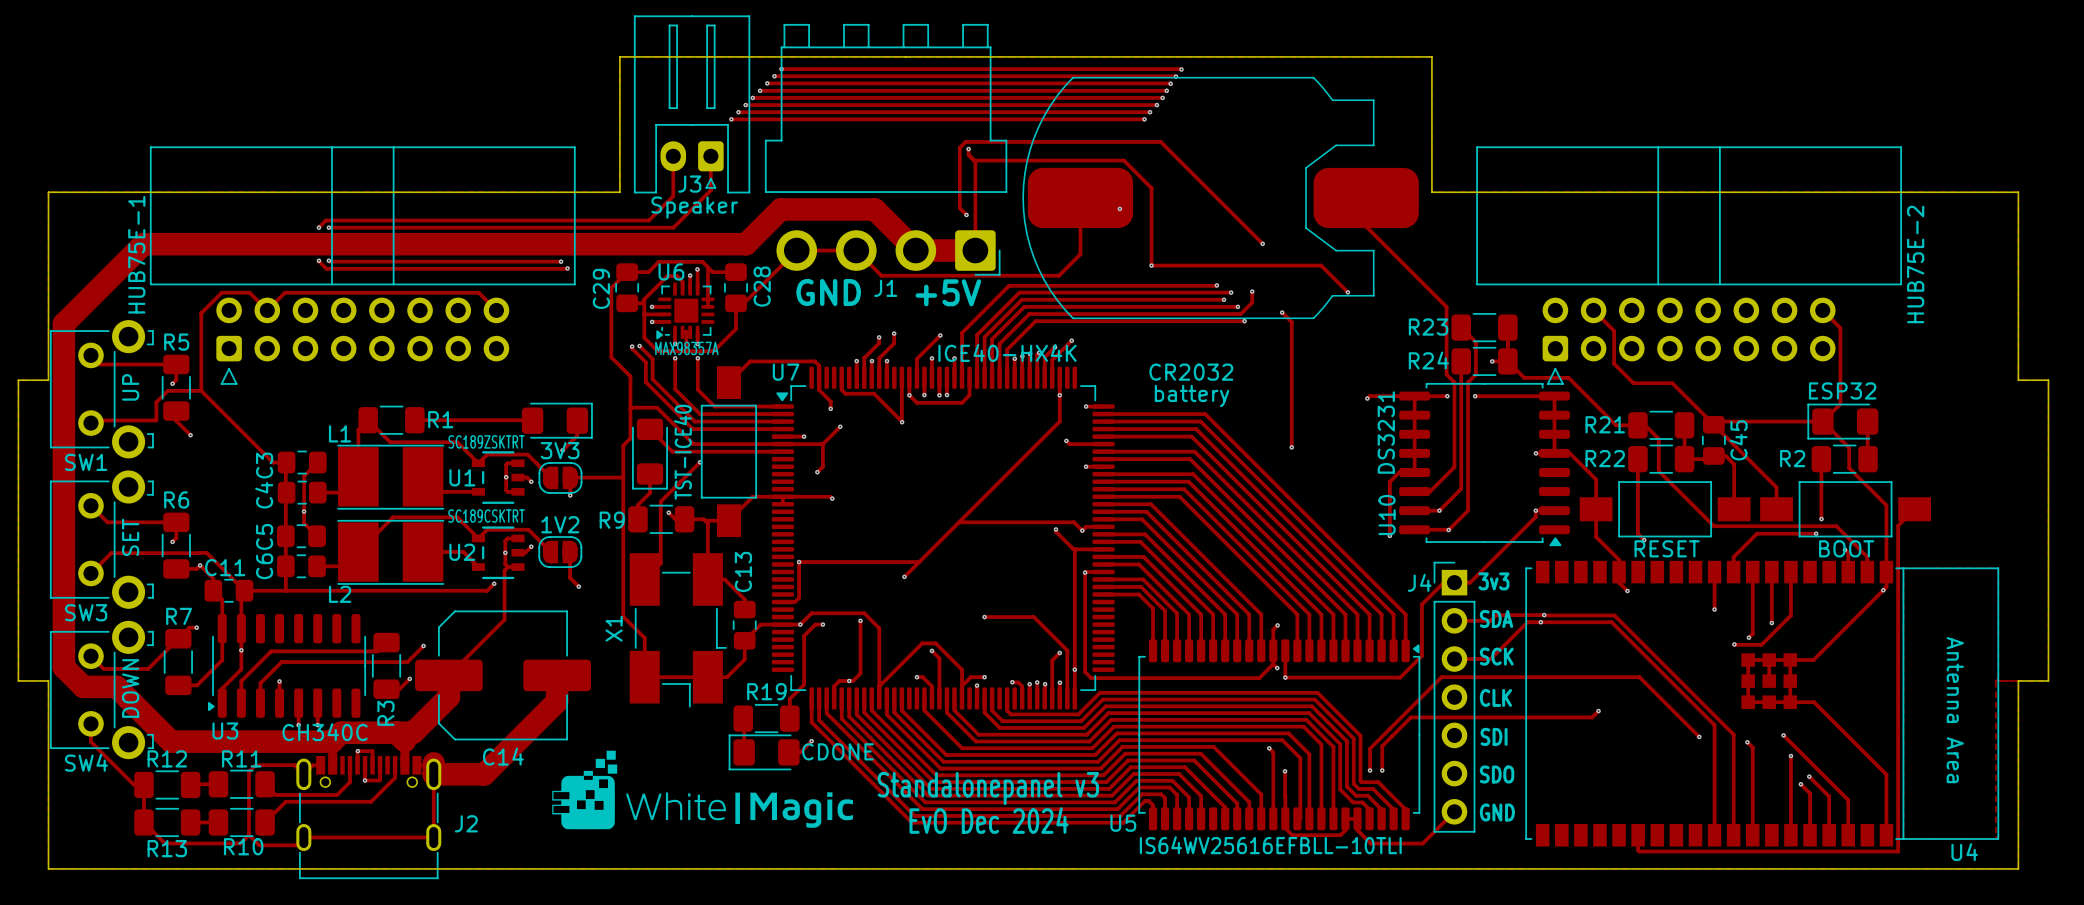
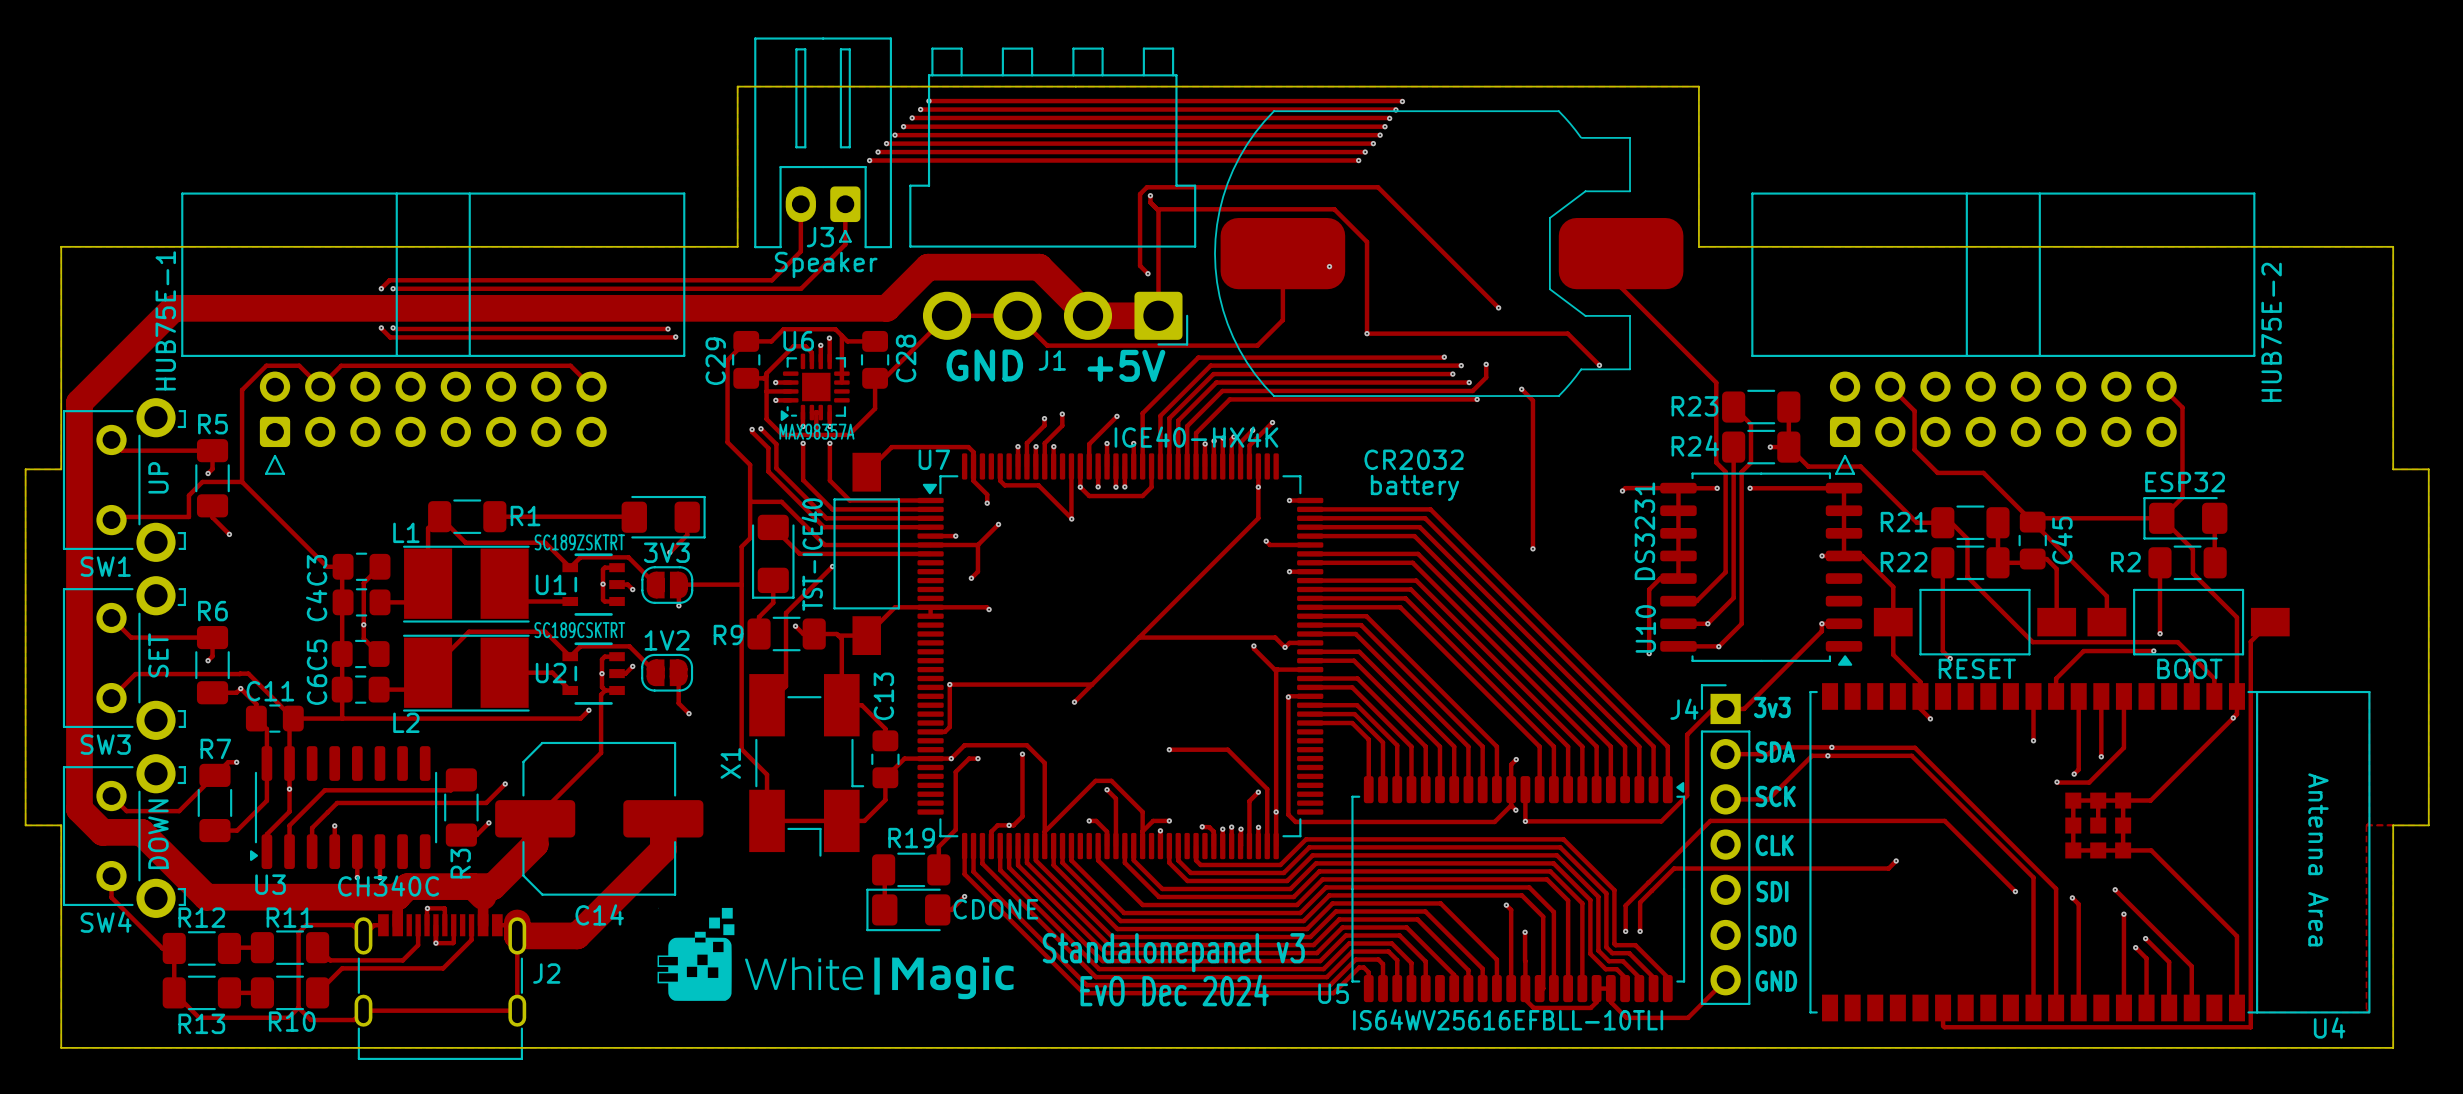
J2 footprint: [296, 756, 442, 880] -> [354, 914, 527, 1060]

